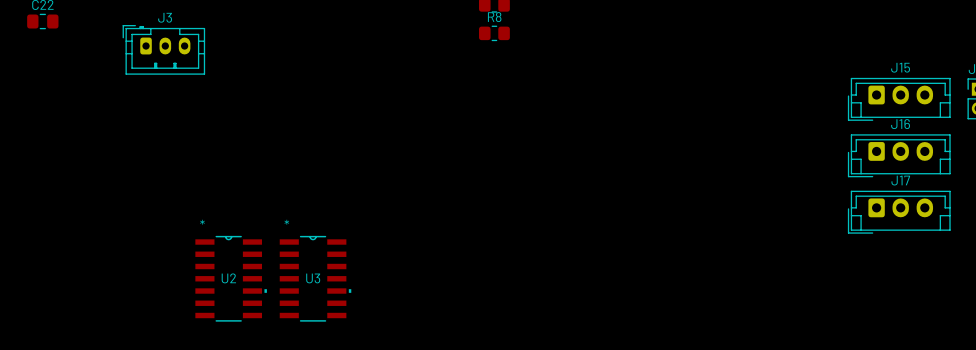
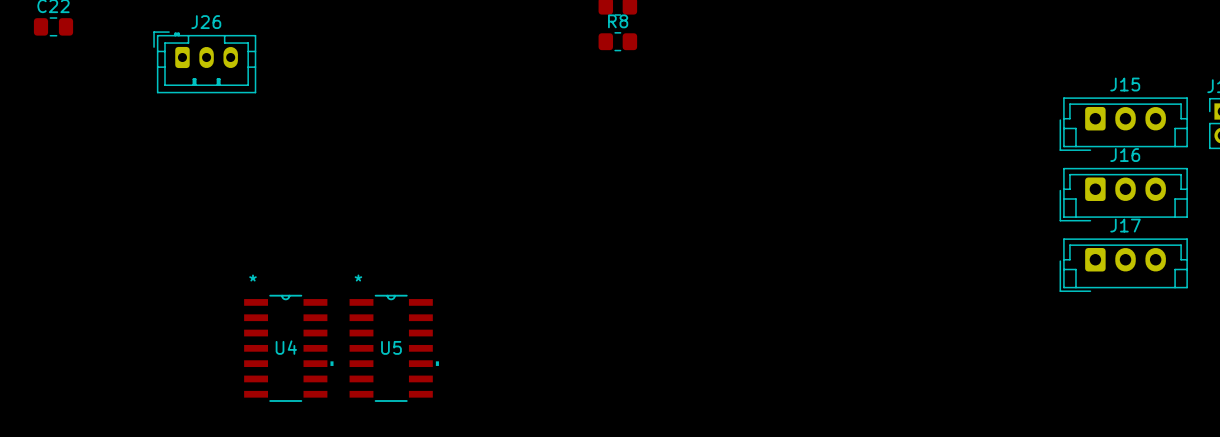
J3 name: J3 (165, 17) -> J26 (206, 22)
U2 name: U2 (228, 278) -> U4 (286, 347)
U3 name: U3 (313, 278) -> U5 (391, 347)

